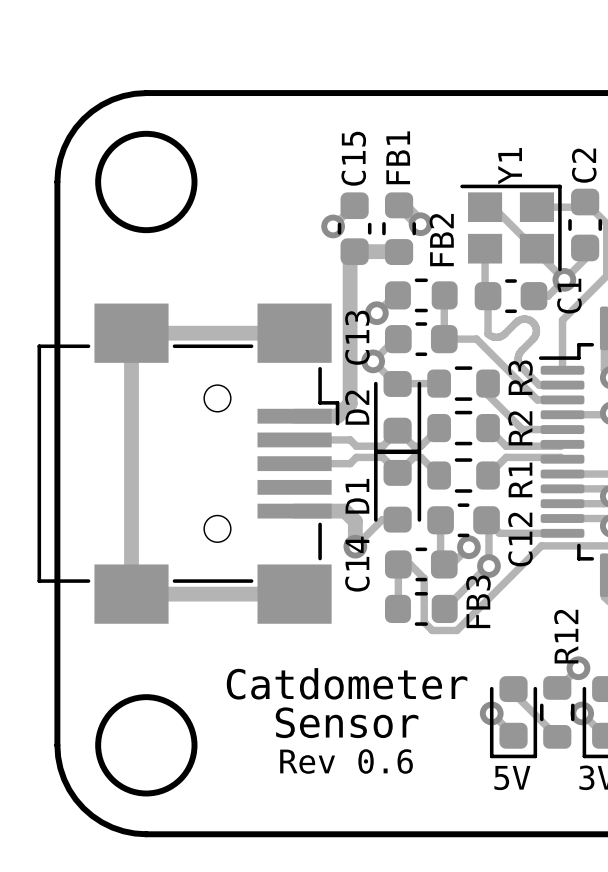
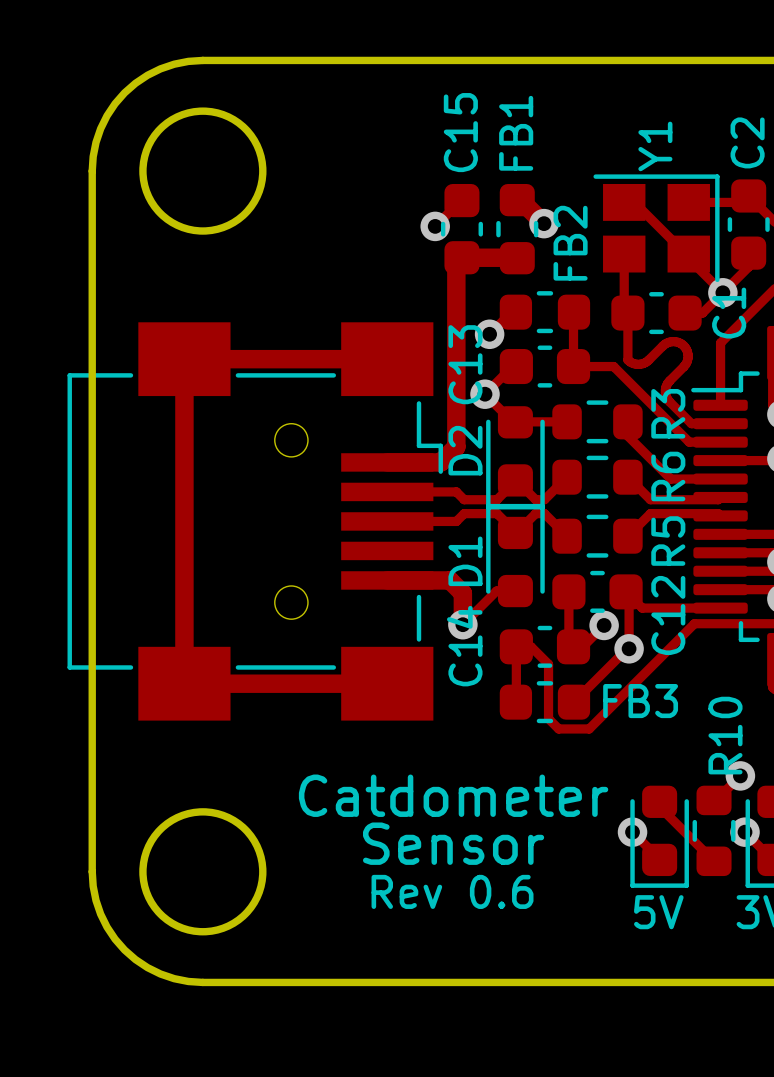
R2 name: R2 (520, 428) -> R6 (668, 476)
R1 name: R1 (520, 479) -> R5 (668, 541)
FB3 name rotation: 0° (478, 601) -> 90° clockwise (640, 701)
R12 name: R12 (566, 636) -> R10 (725, 735)

